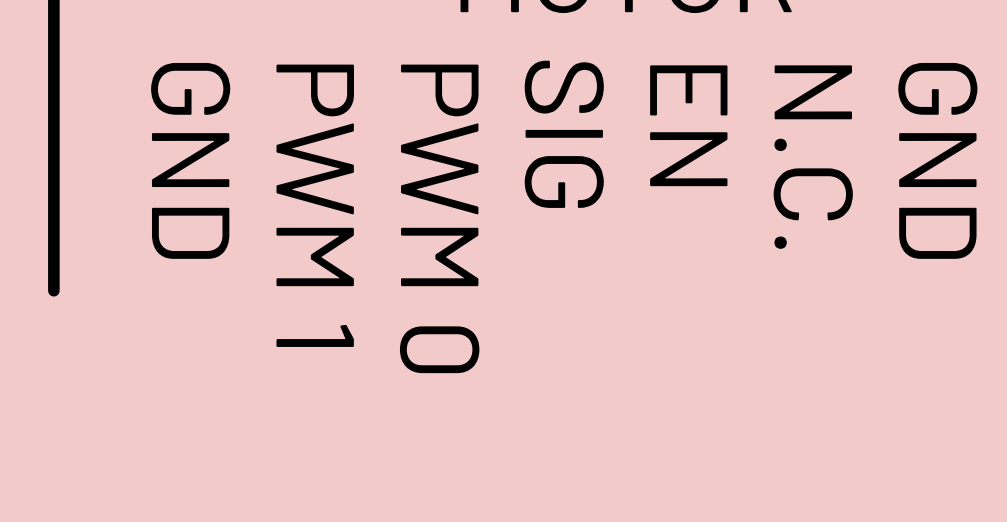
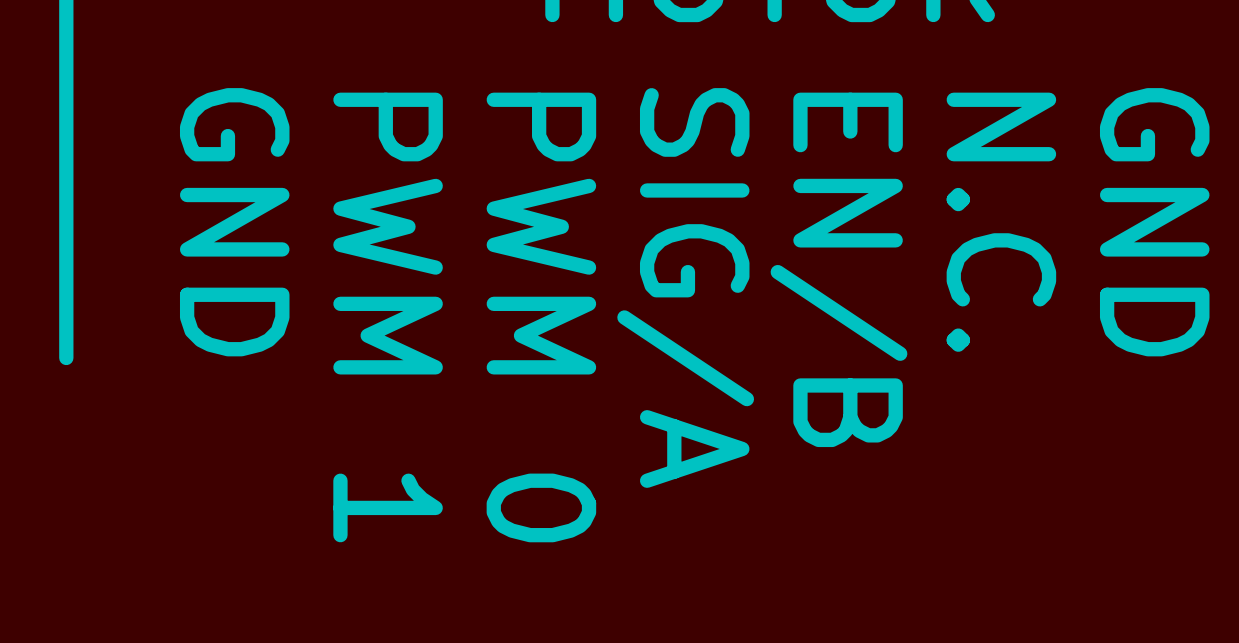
text: EN (688, 125) -> EN/B (839, 269)
text: SIG (564, 134) -> SIG/A (685, 287)

